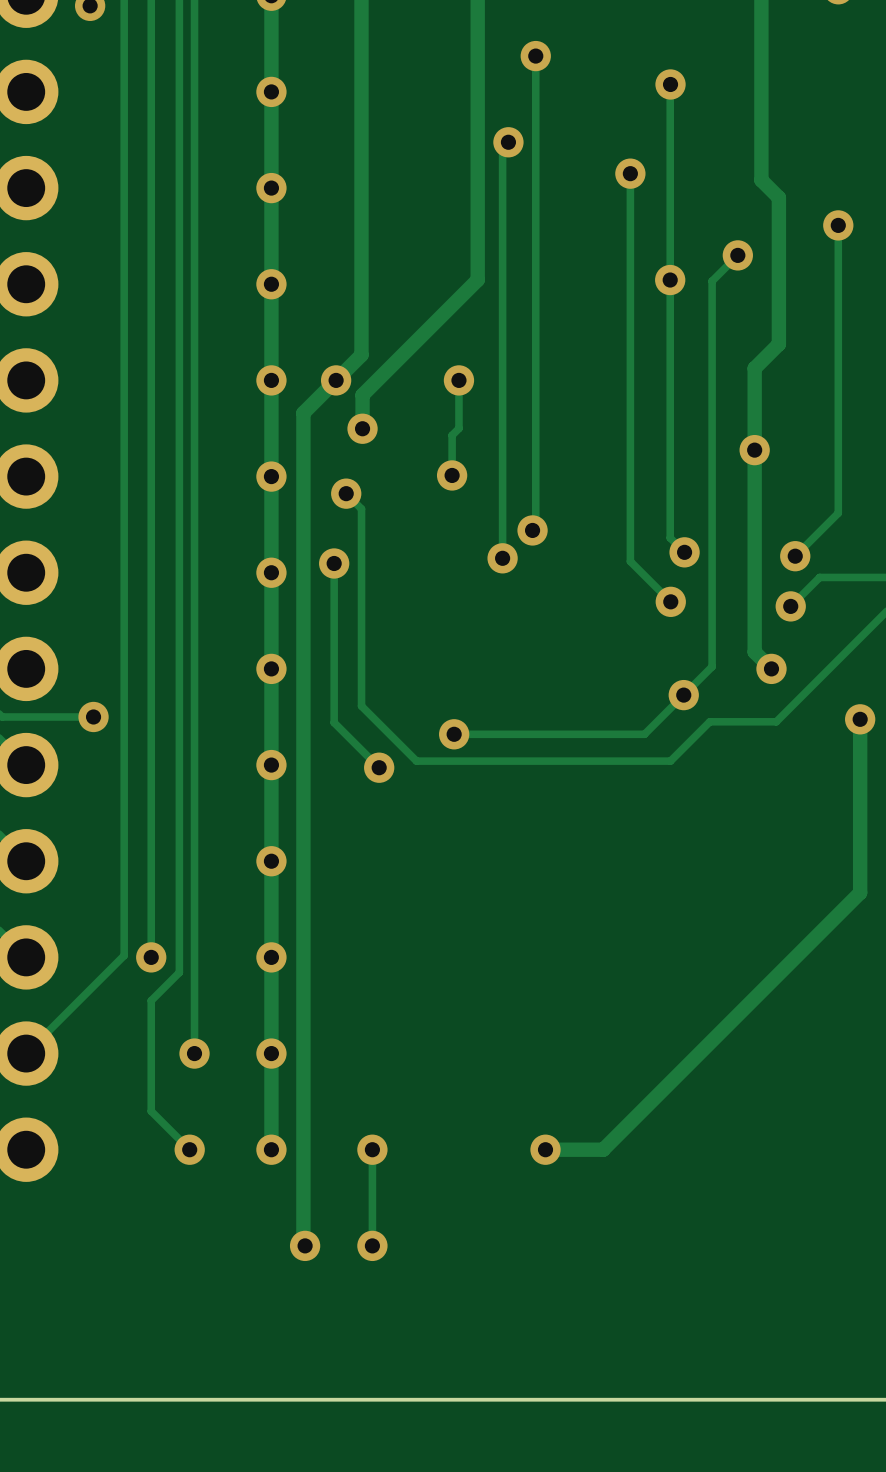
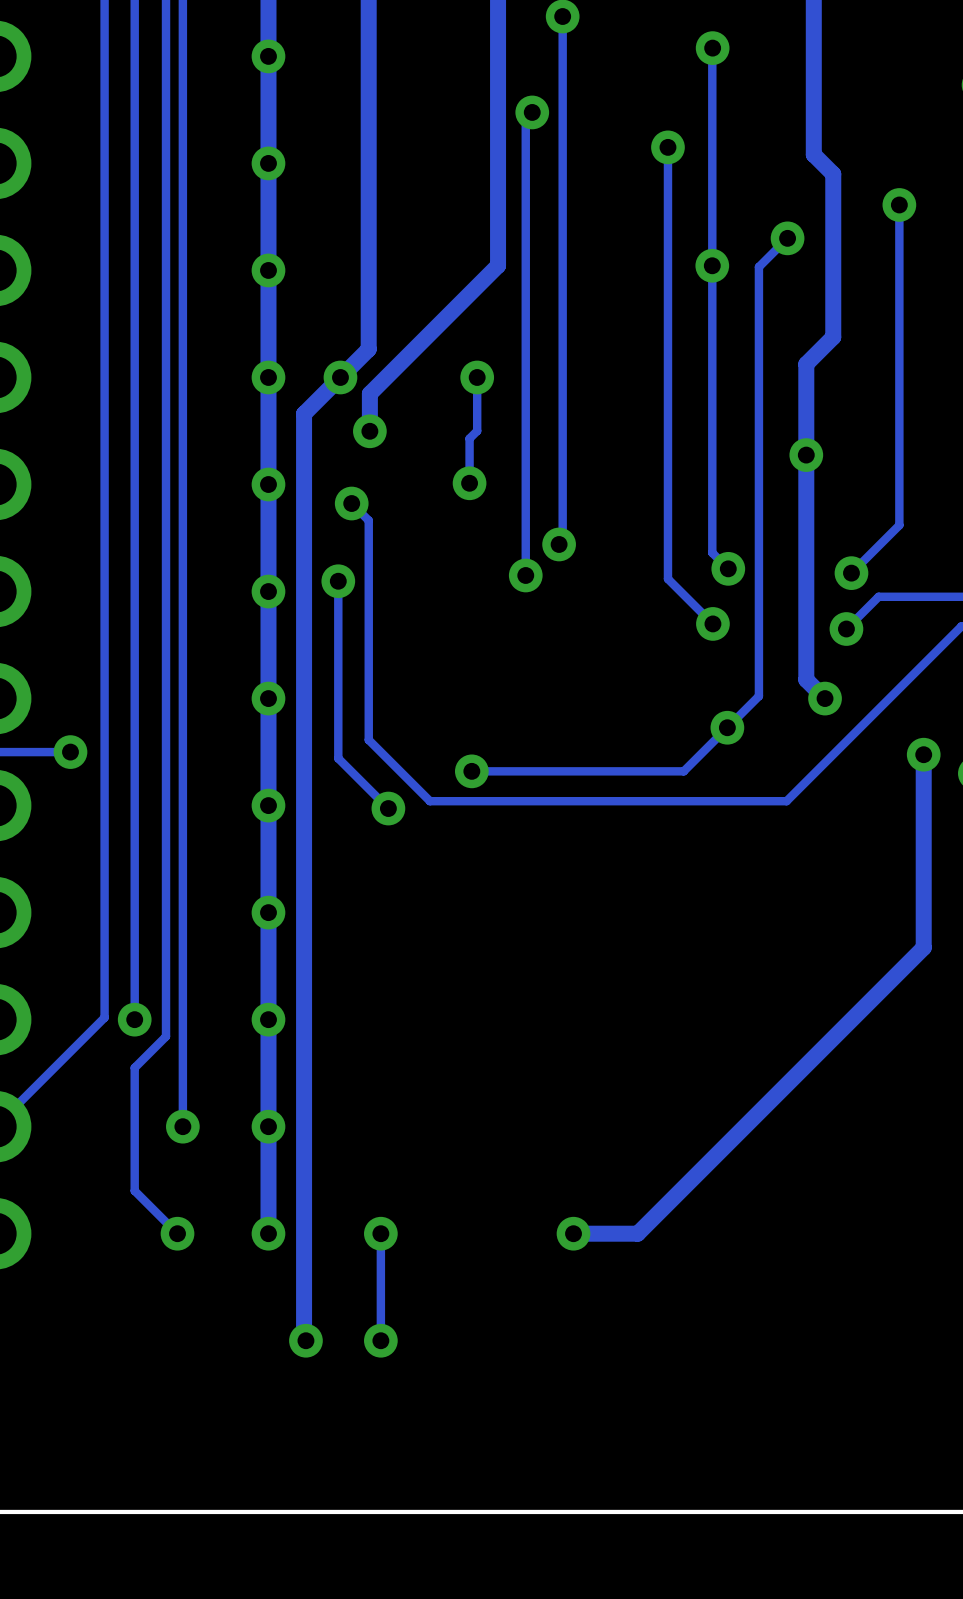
track: (776, 721) (709, 721) (670, 761) -> (830, 757) (786, 801) (712, 801)

